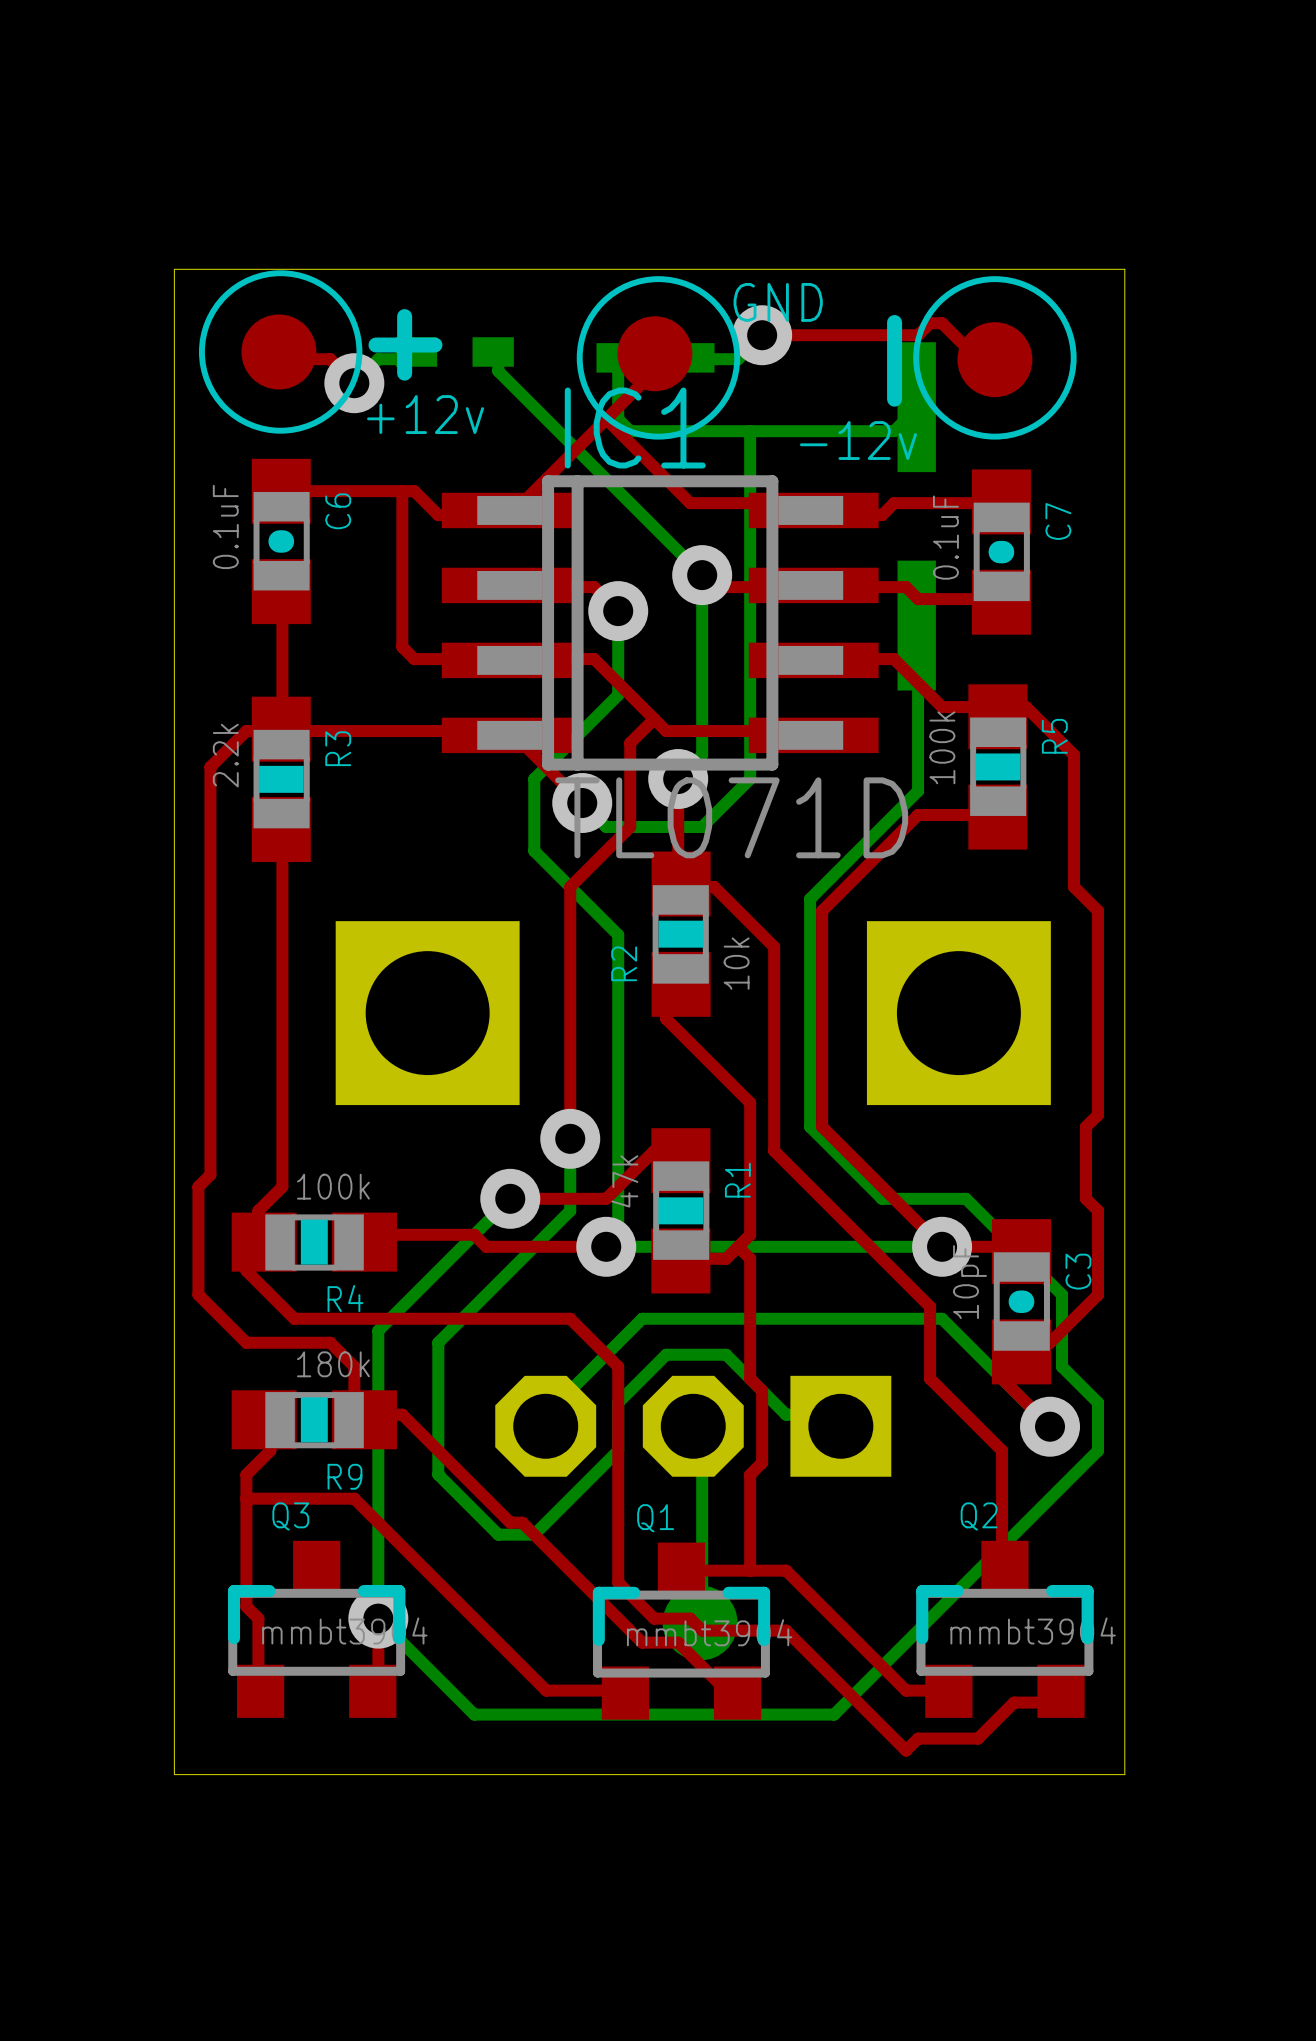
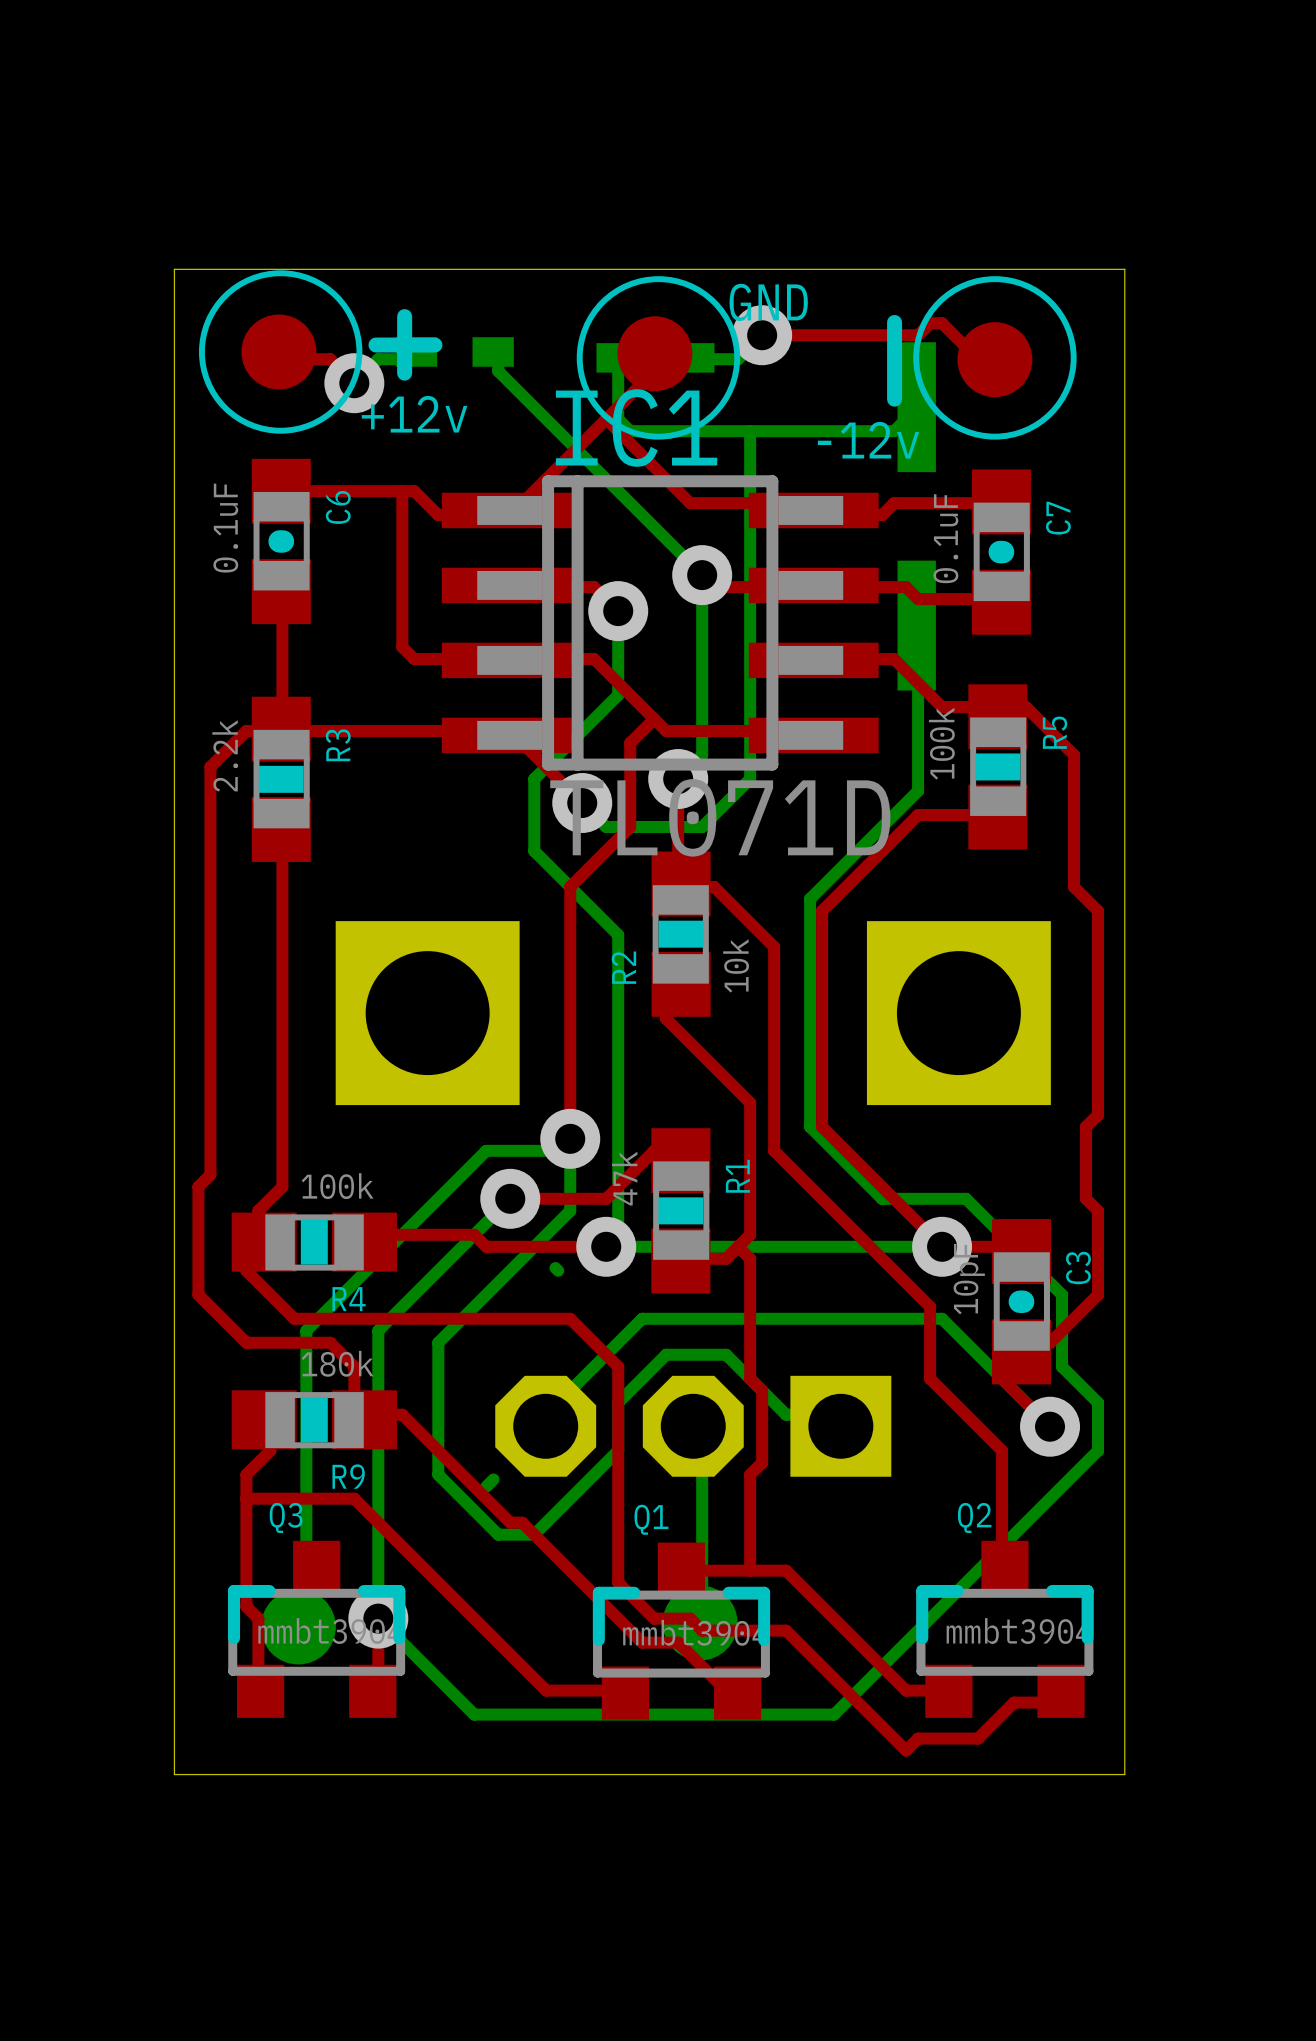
bottom track: none -> (570, 1150) (486, 1150) (306, 1330) (306, 1618) (298, 1626)
bottom track: none -> (555, 1268) (558, 1270)
bottom track: none -> (493, 1479) (486, 1486)
part: none -> (298, 1626)

